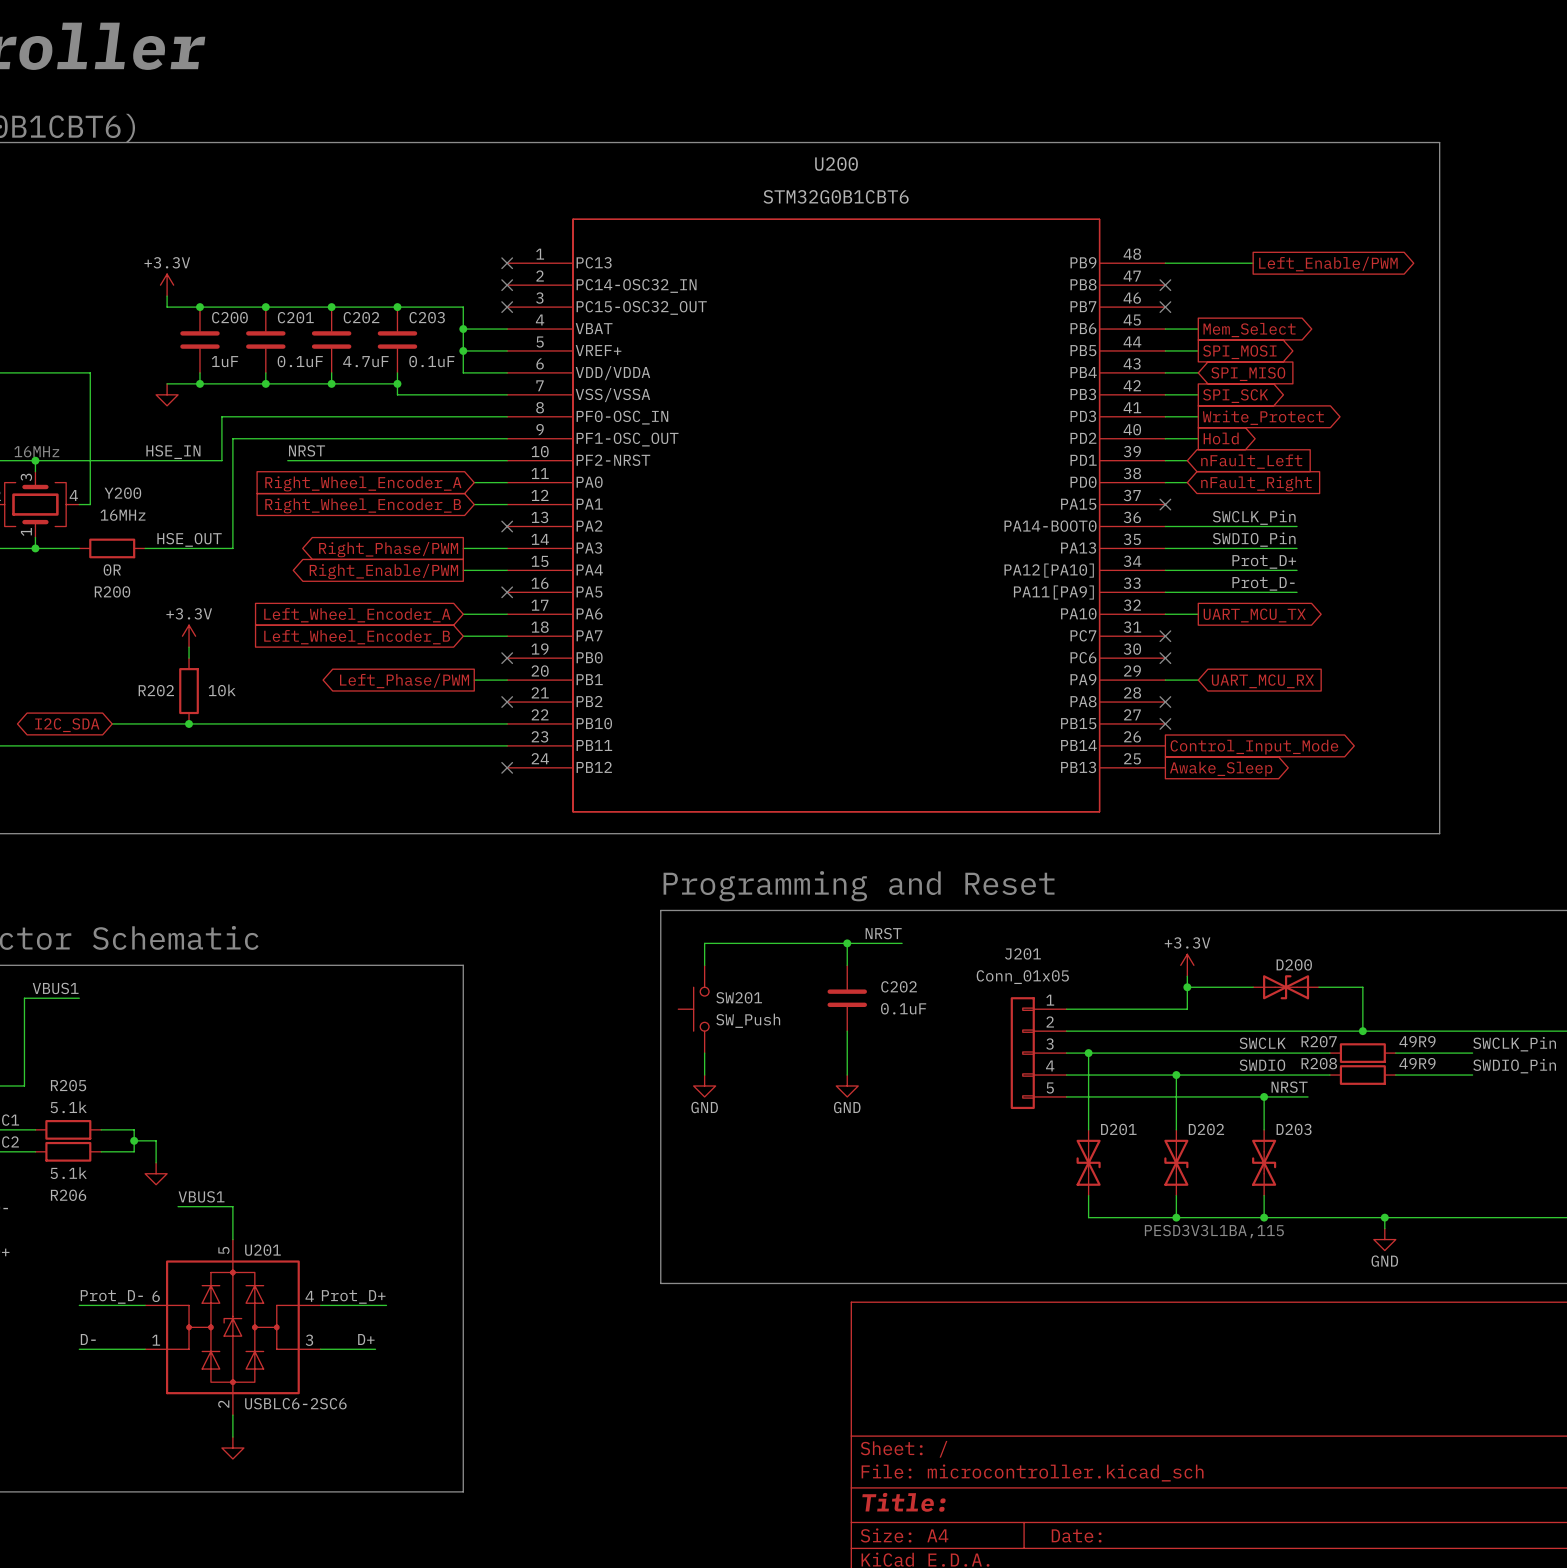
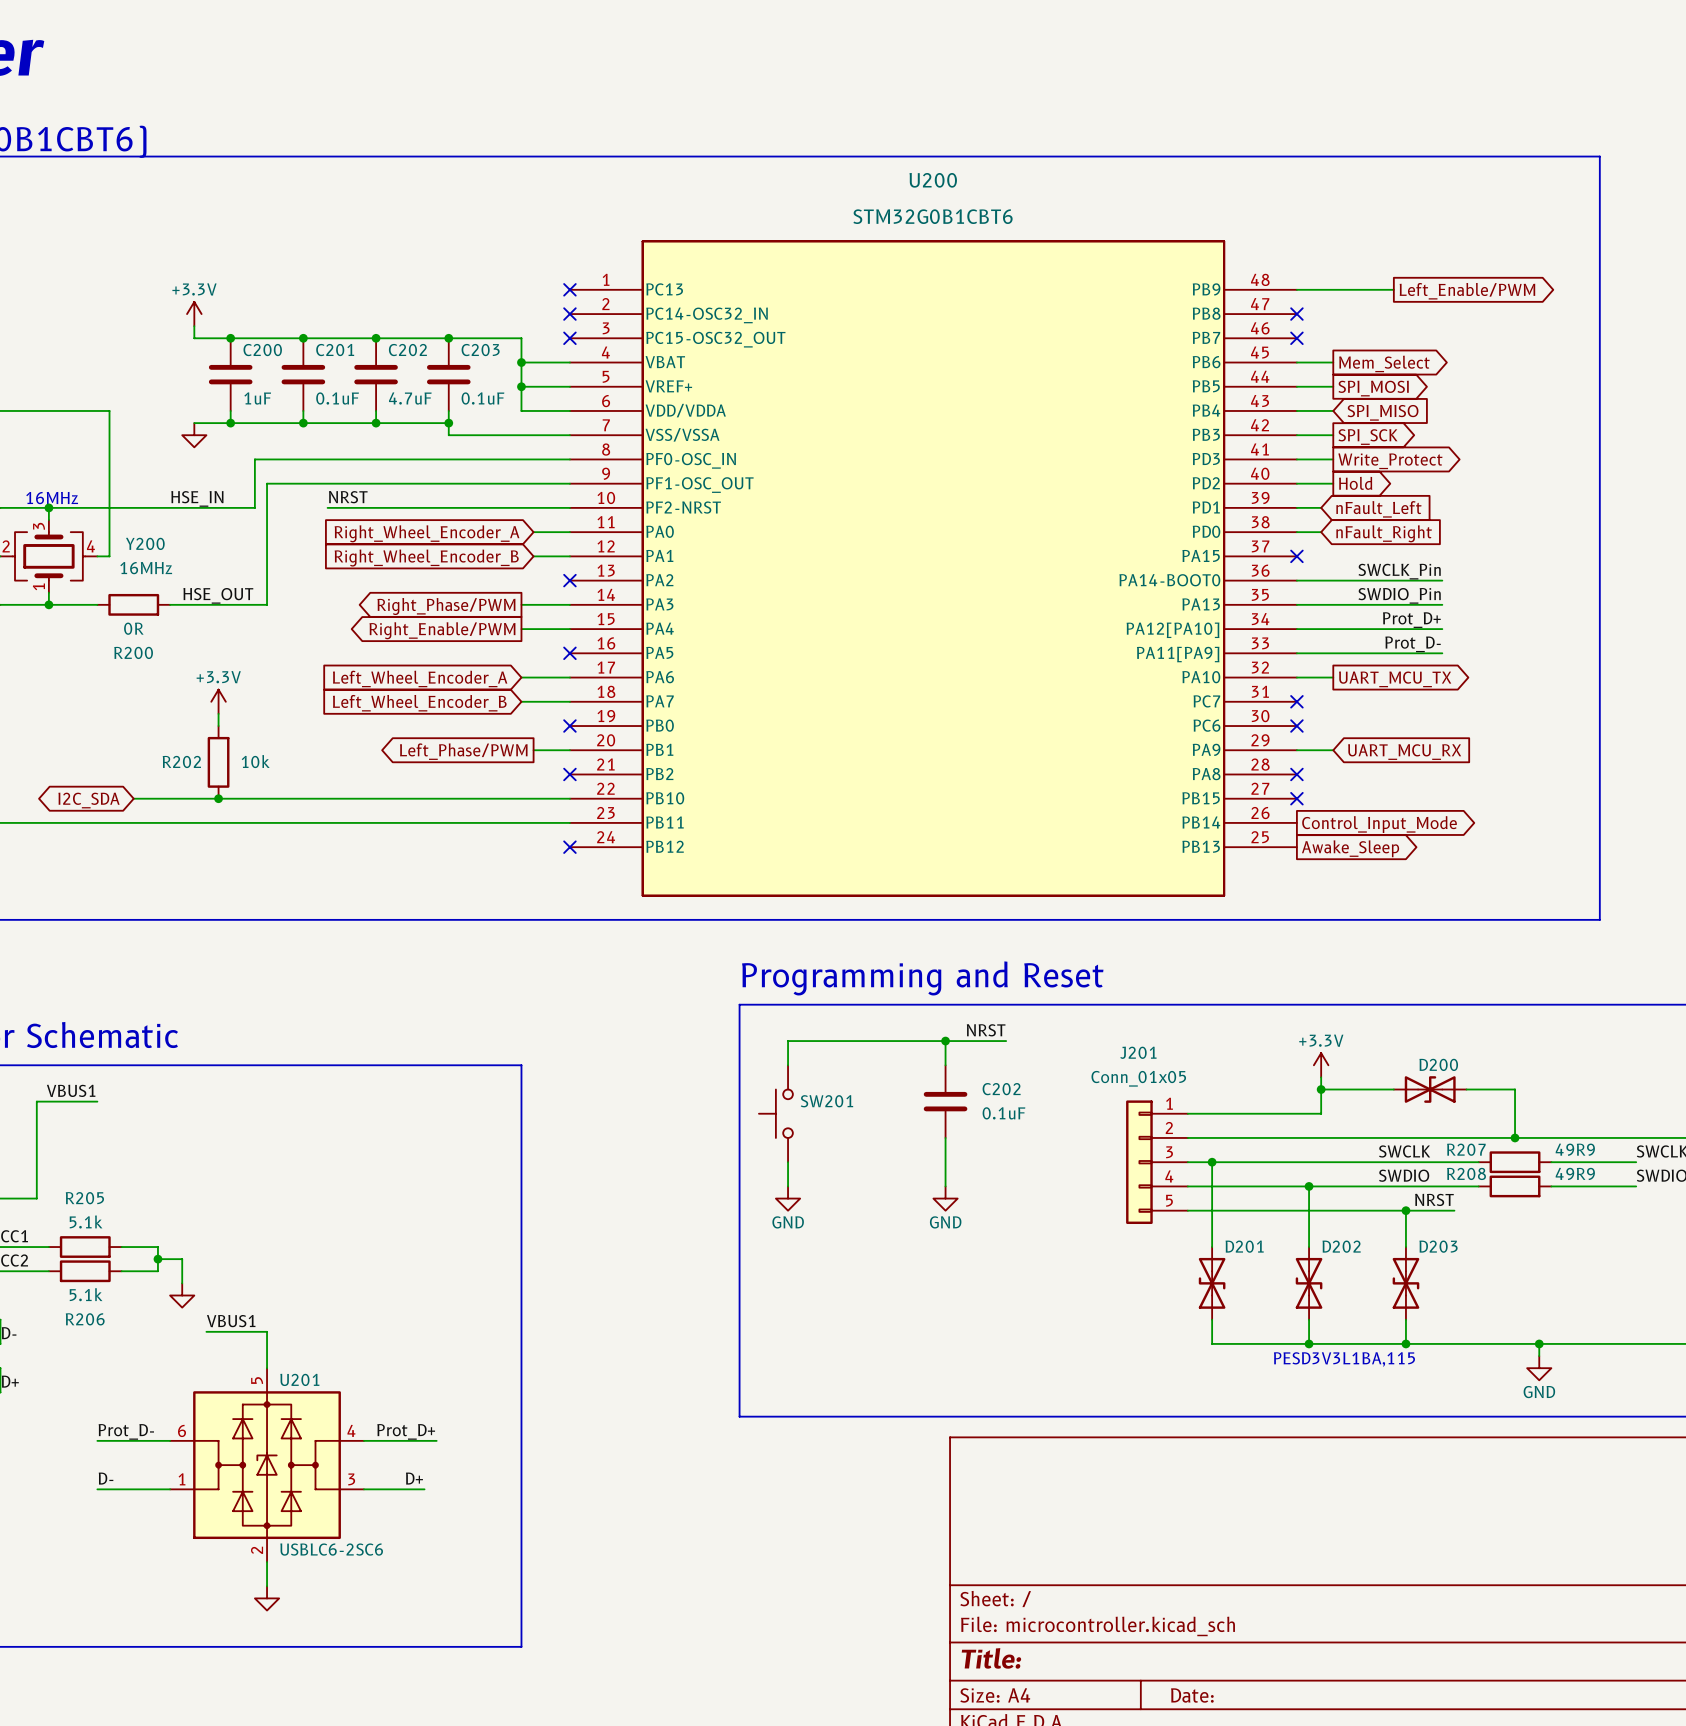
SW201 value: SW_Push (748, 1020) -> none

